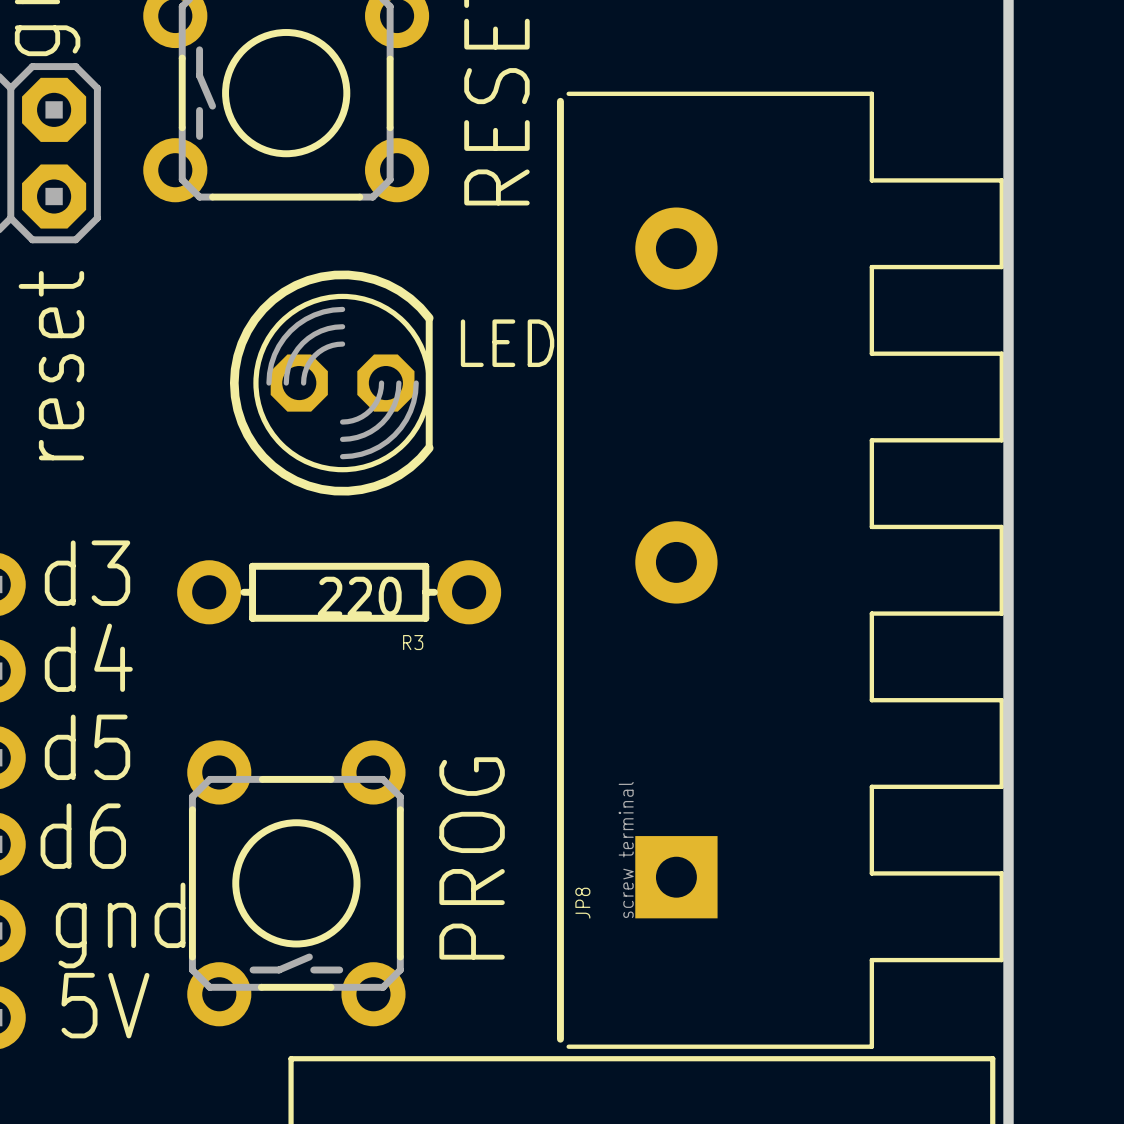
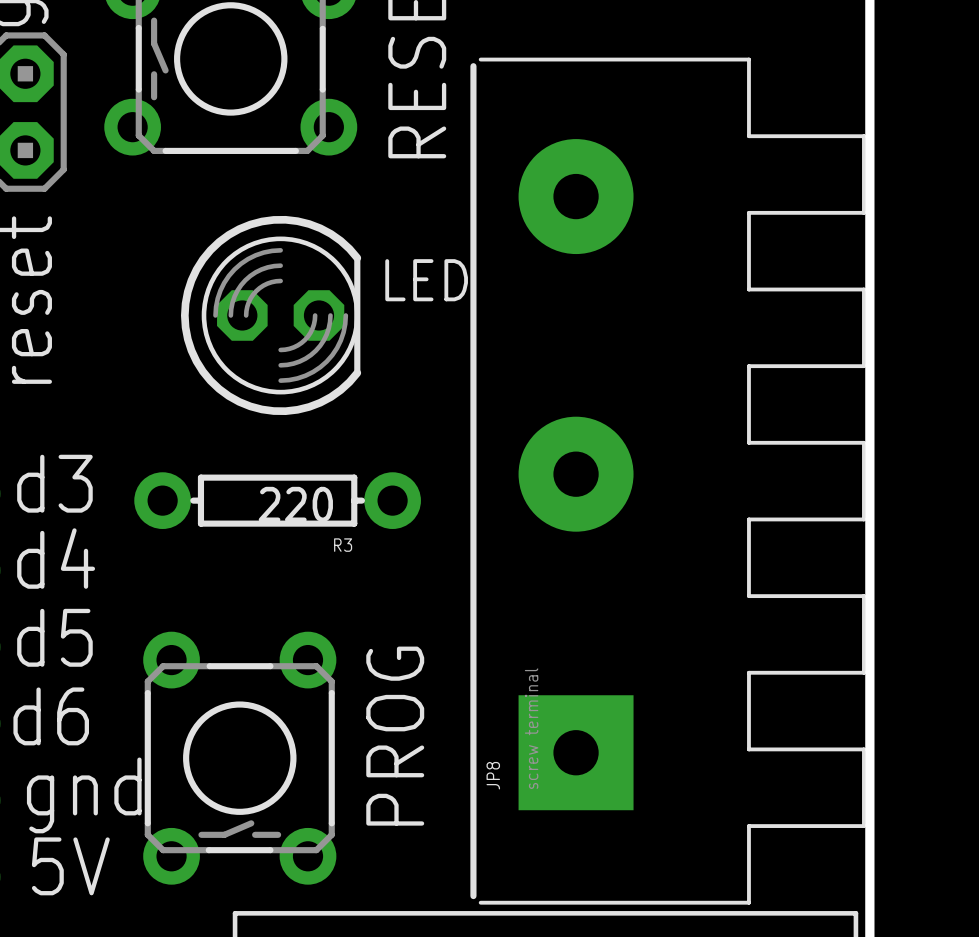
JP8 footprint: [557, 91, 1004, 1049] -> [470, 57, 866, 905]

